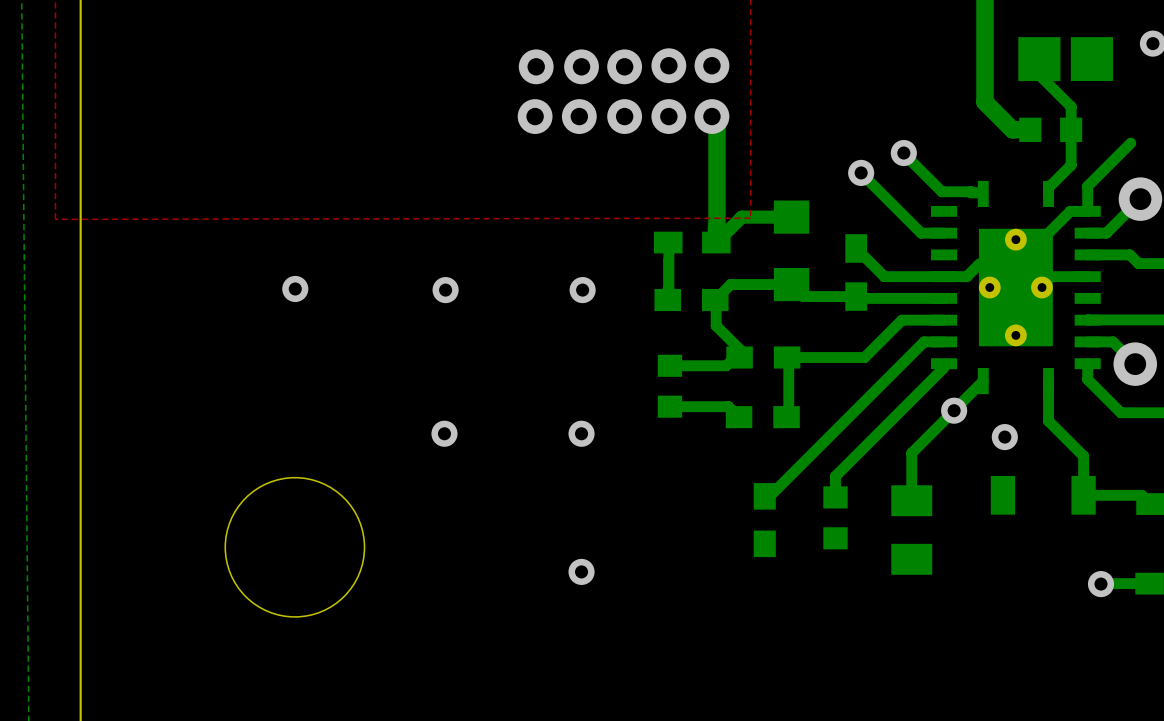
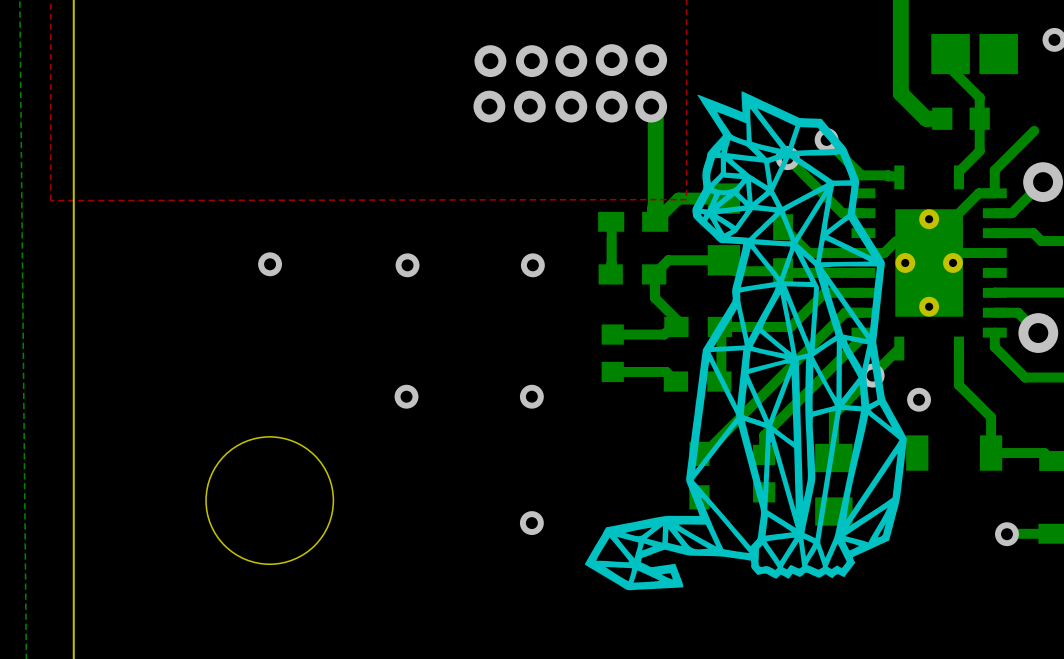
drawing: none -> [584, 91, 907, 591]

